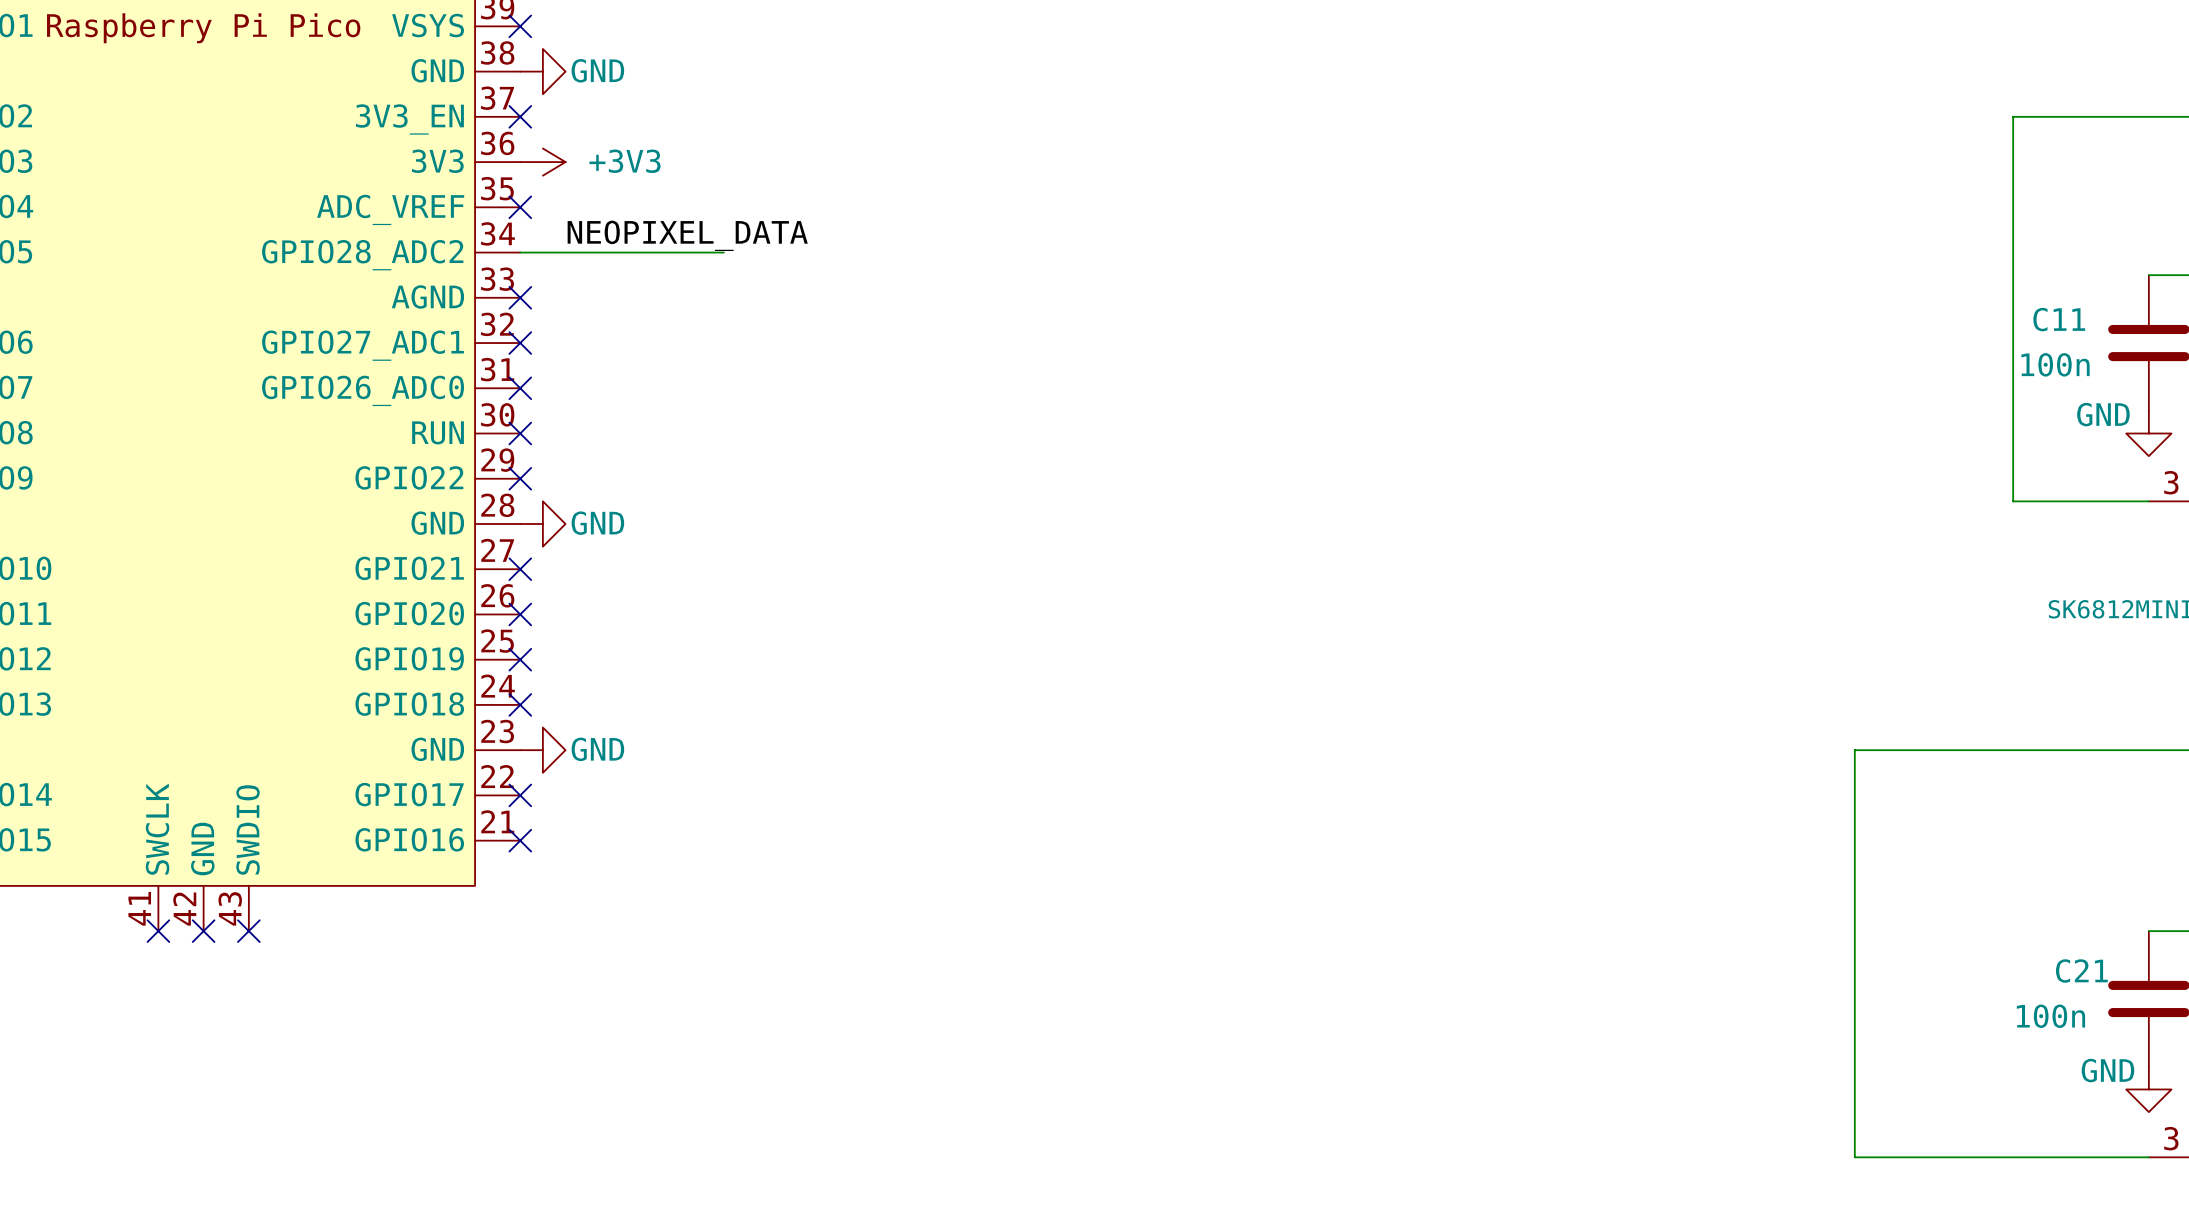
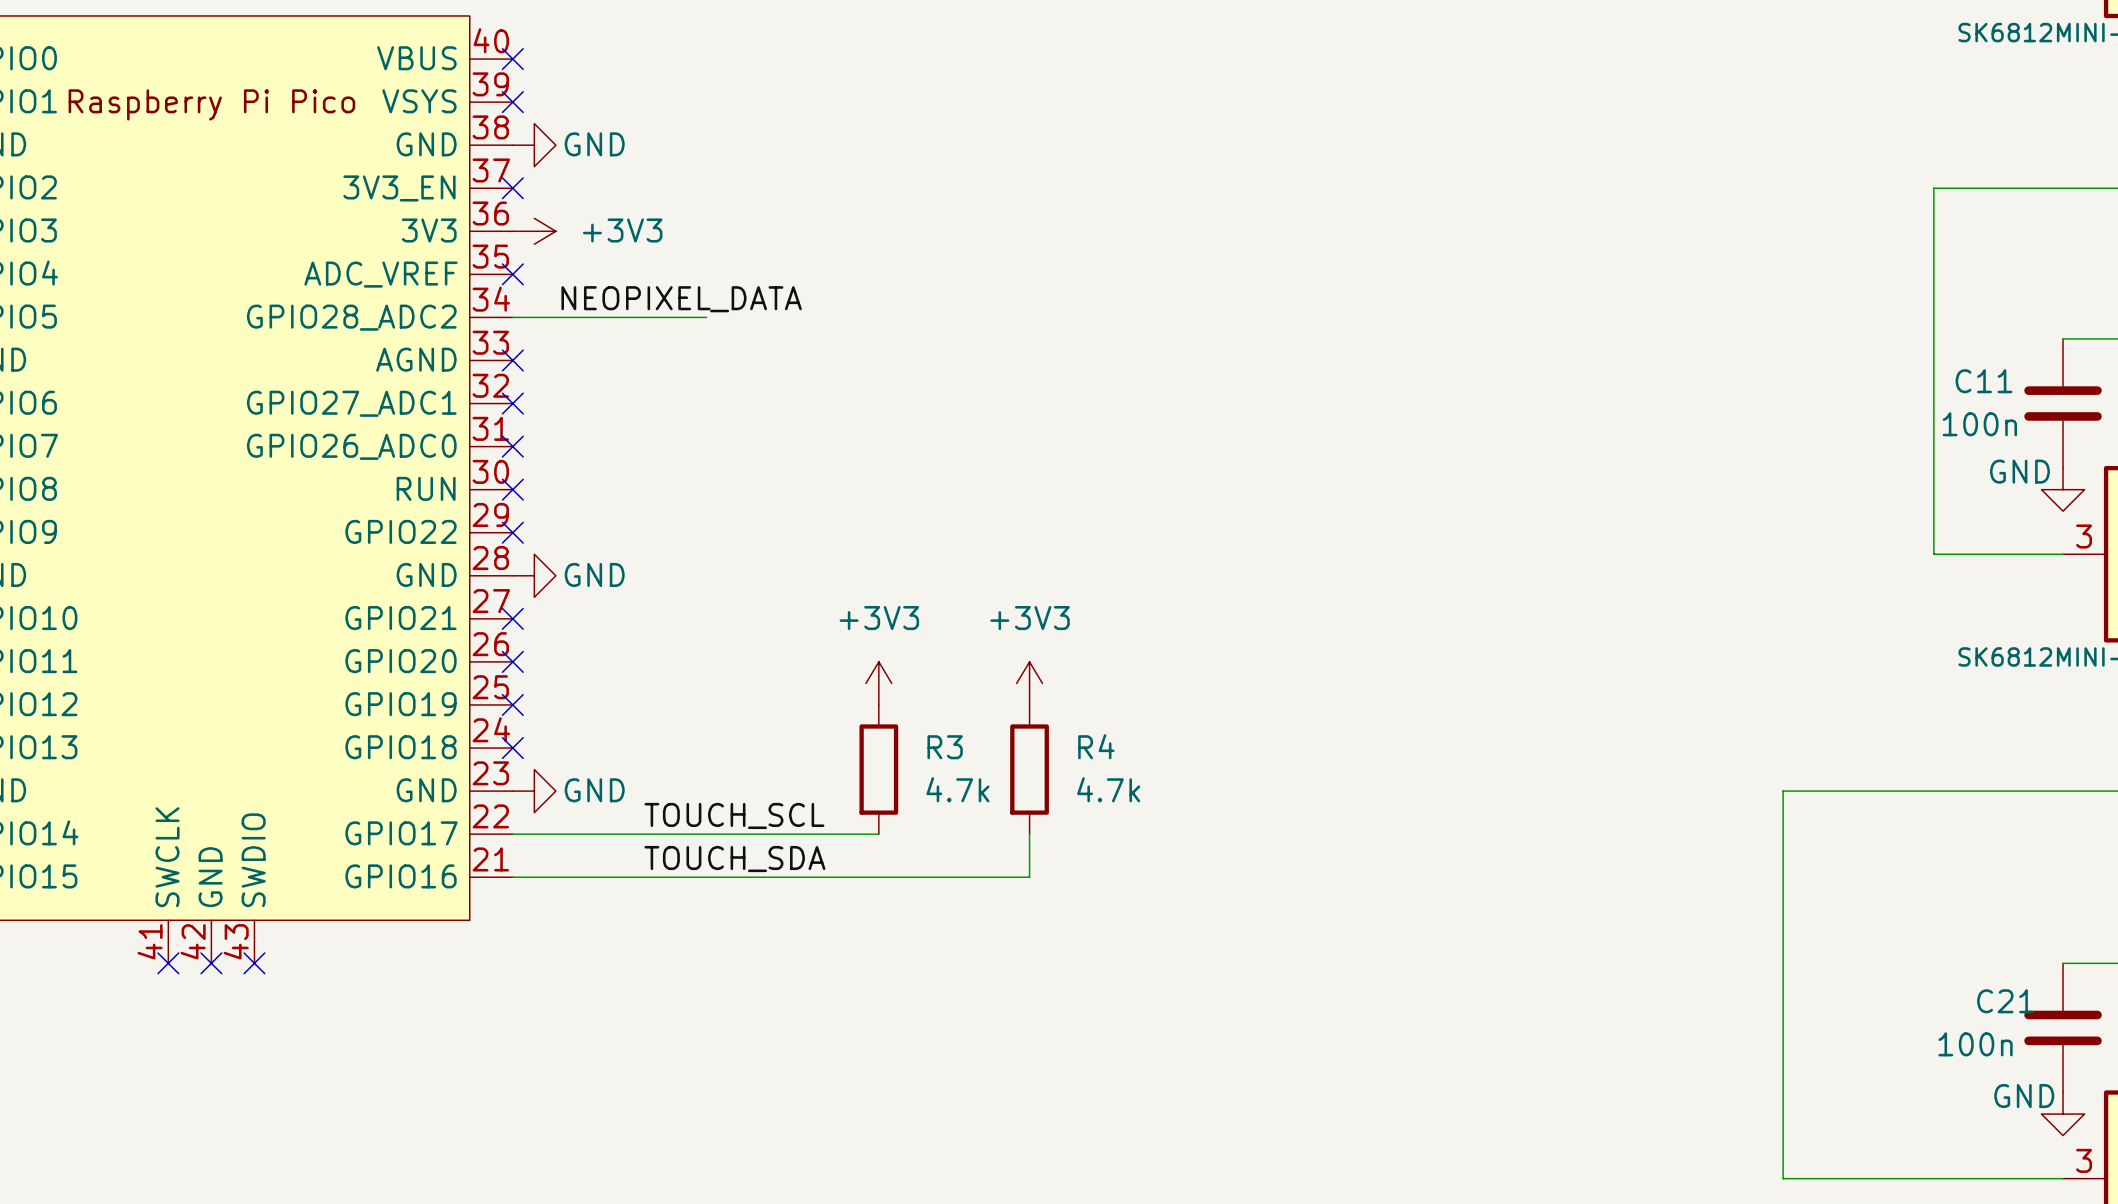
power symbol: none -> +3V3 (878, 683)
power symbol: none -> +3V3 (1029, 683)
R3: none -> 4.7k (878, 769)
R4: none -> 4.7k (1029, 769)
label: none -> TOUCH_SCL (734, 815)
wire: none -> (512, 834) (878, 834)
no-connect mark: (520, 795) -> none
wire: none -> (1029, 834) (1029, 877) (512, 877)
label: none -> TOUCH_SDA (734, 859)
no-connect mark: (520, 840) -> none

